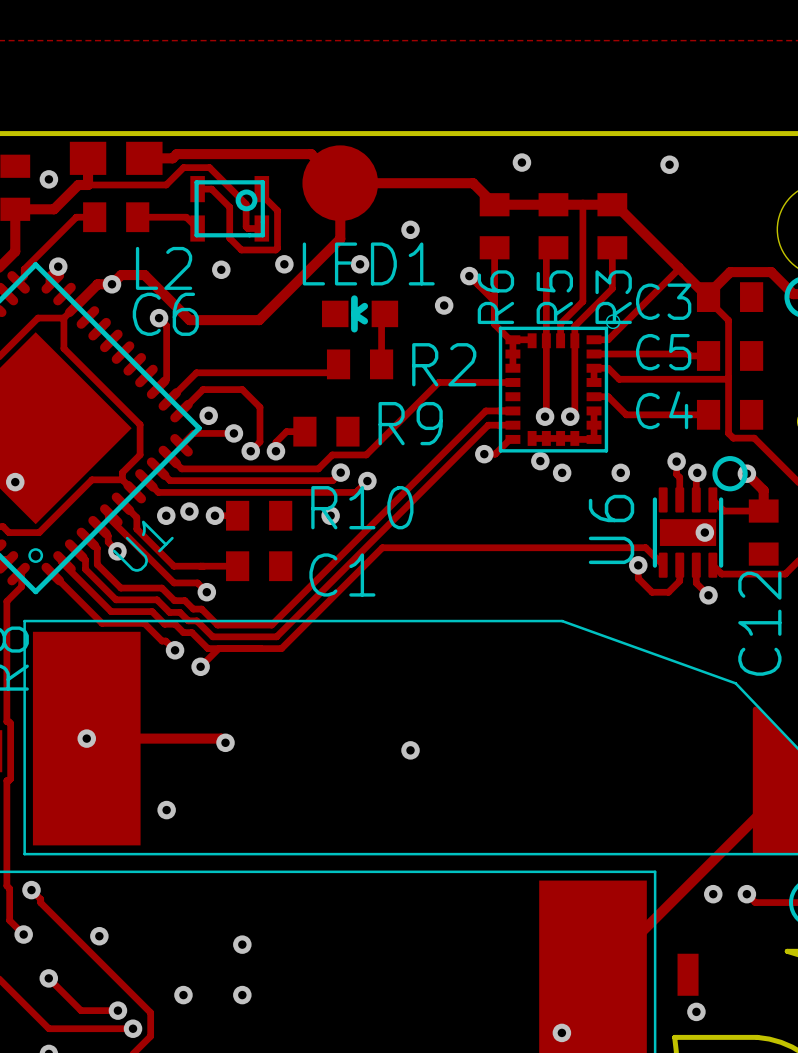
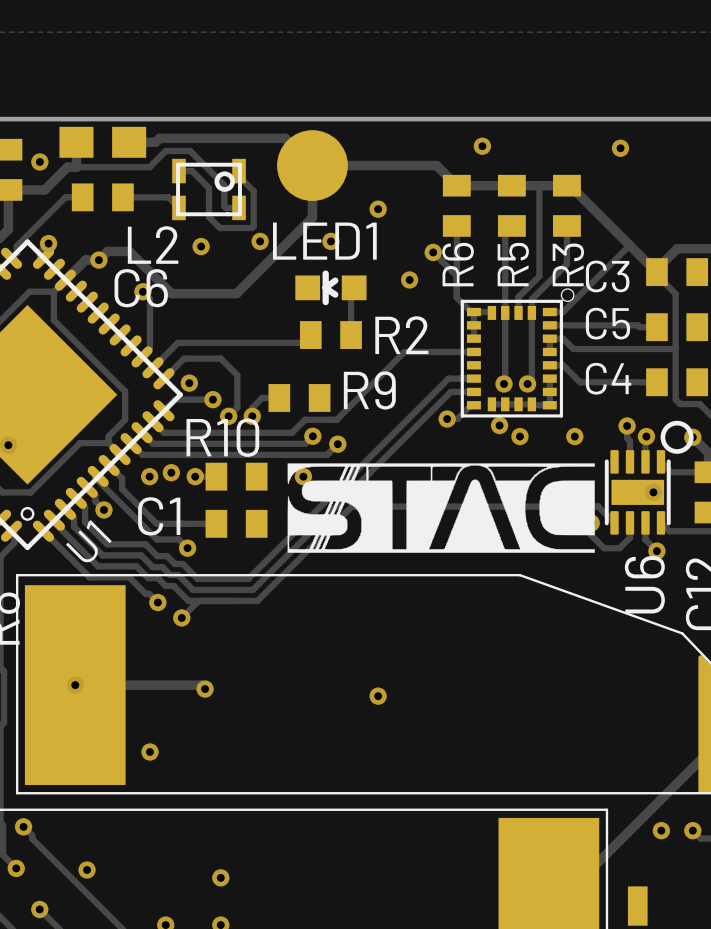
drawing: none -> [287, 463, 595, 553]
R10 name position: R10 (362, 507) -> R10 (222, 437)
U6 name position: U6 (611, 529) -> U6 (644, 584)
U1 name position: U1 (143, 546) -> U1 (88, 541)
C1 name position: C1 (342, 574) -> C1 (159, 516)

